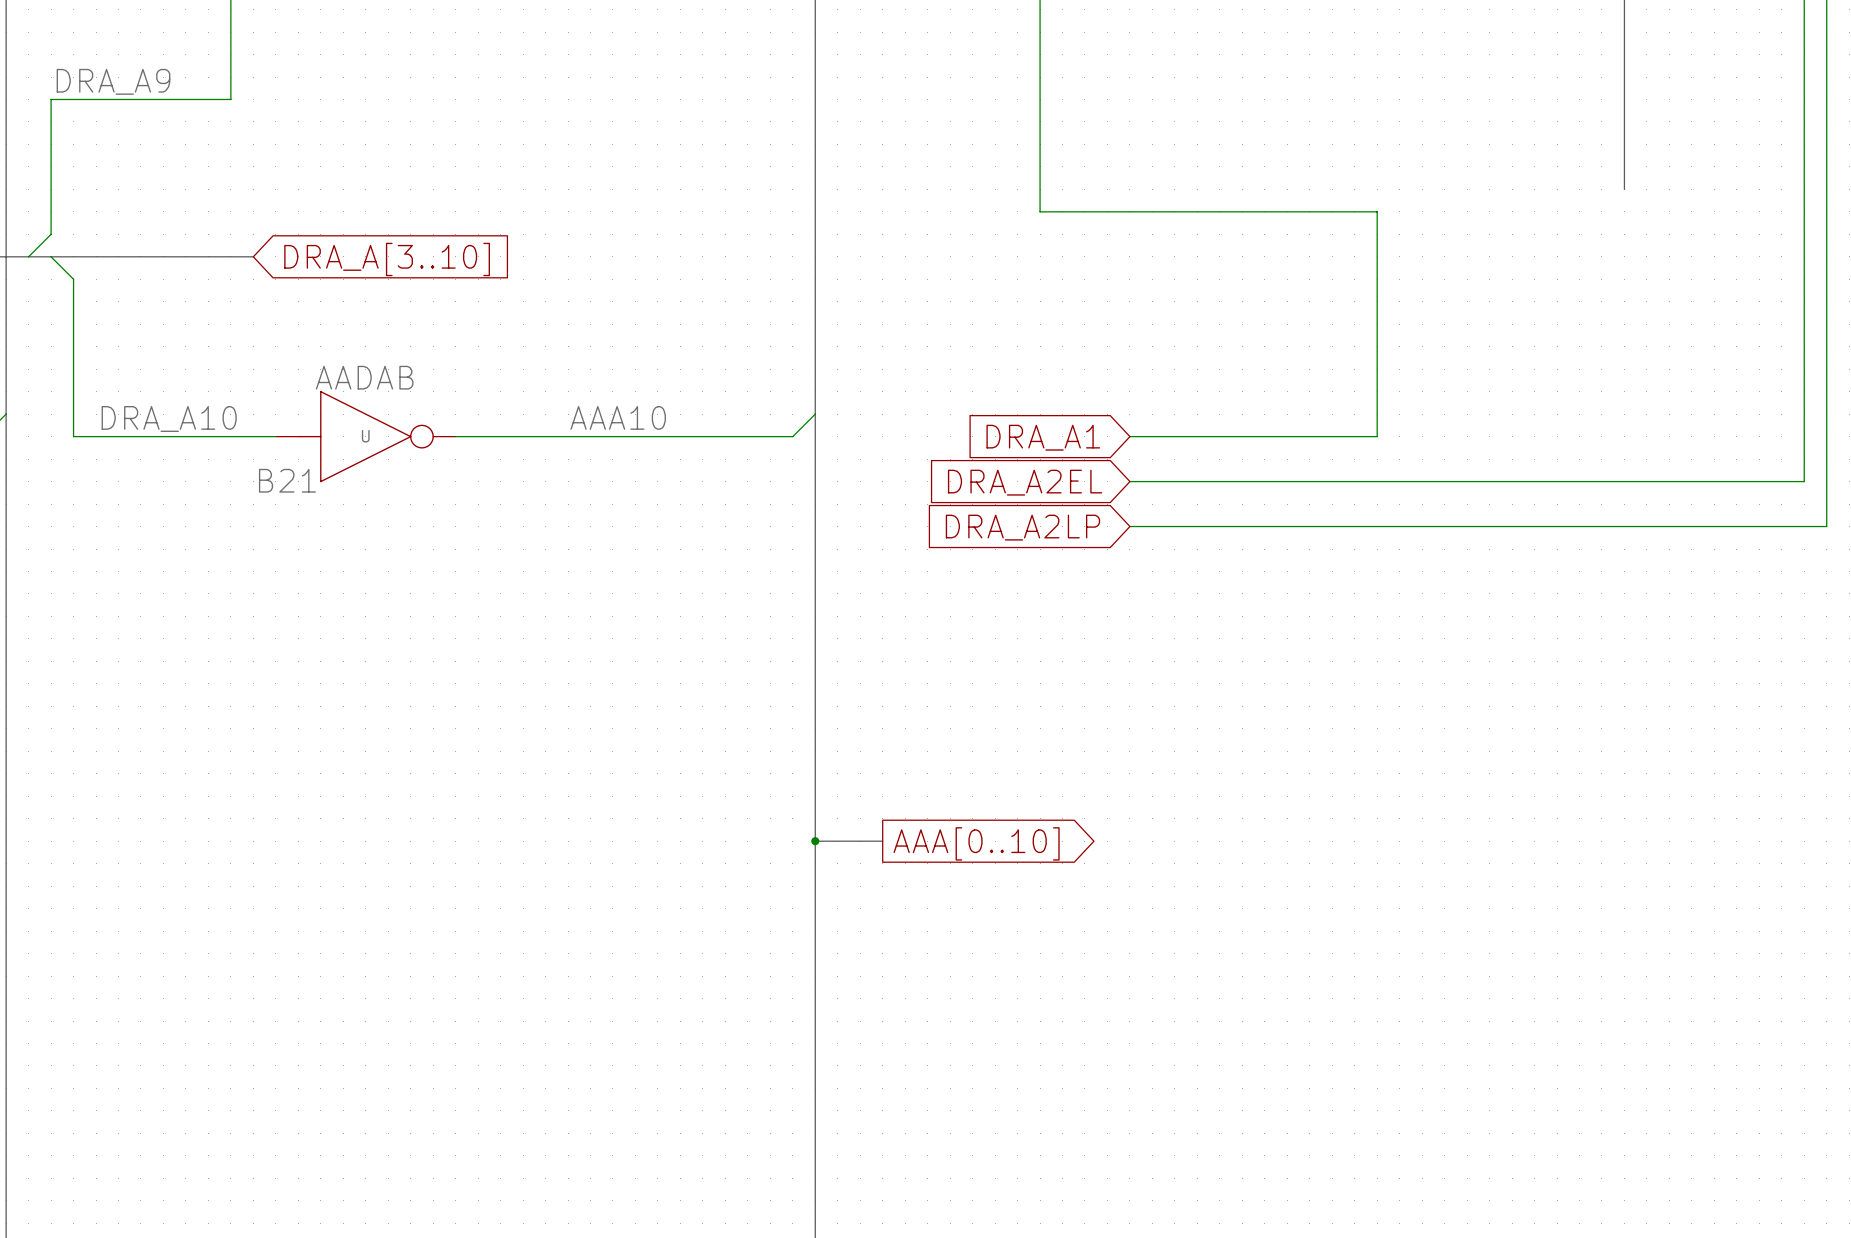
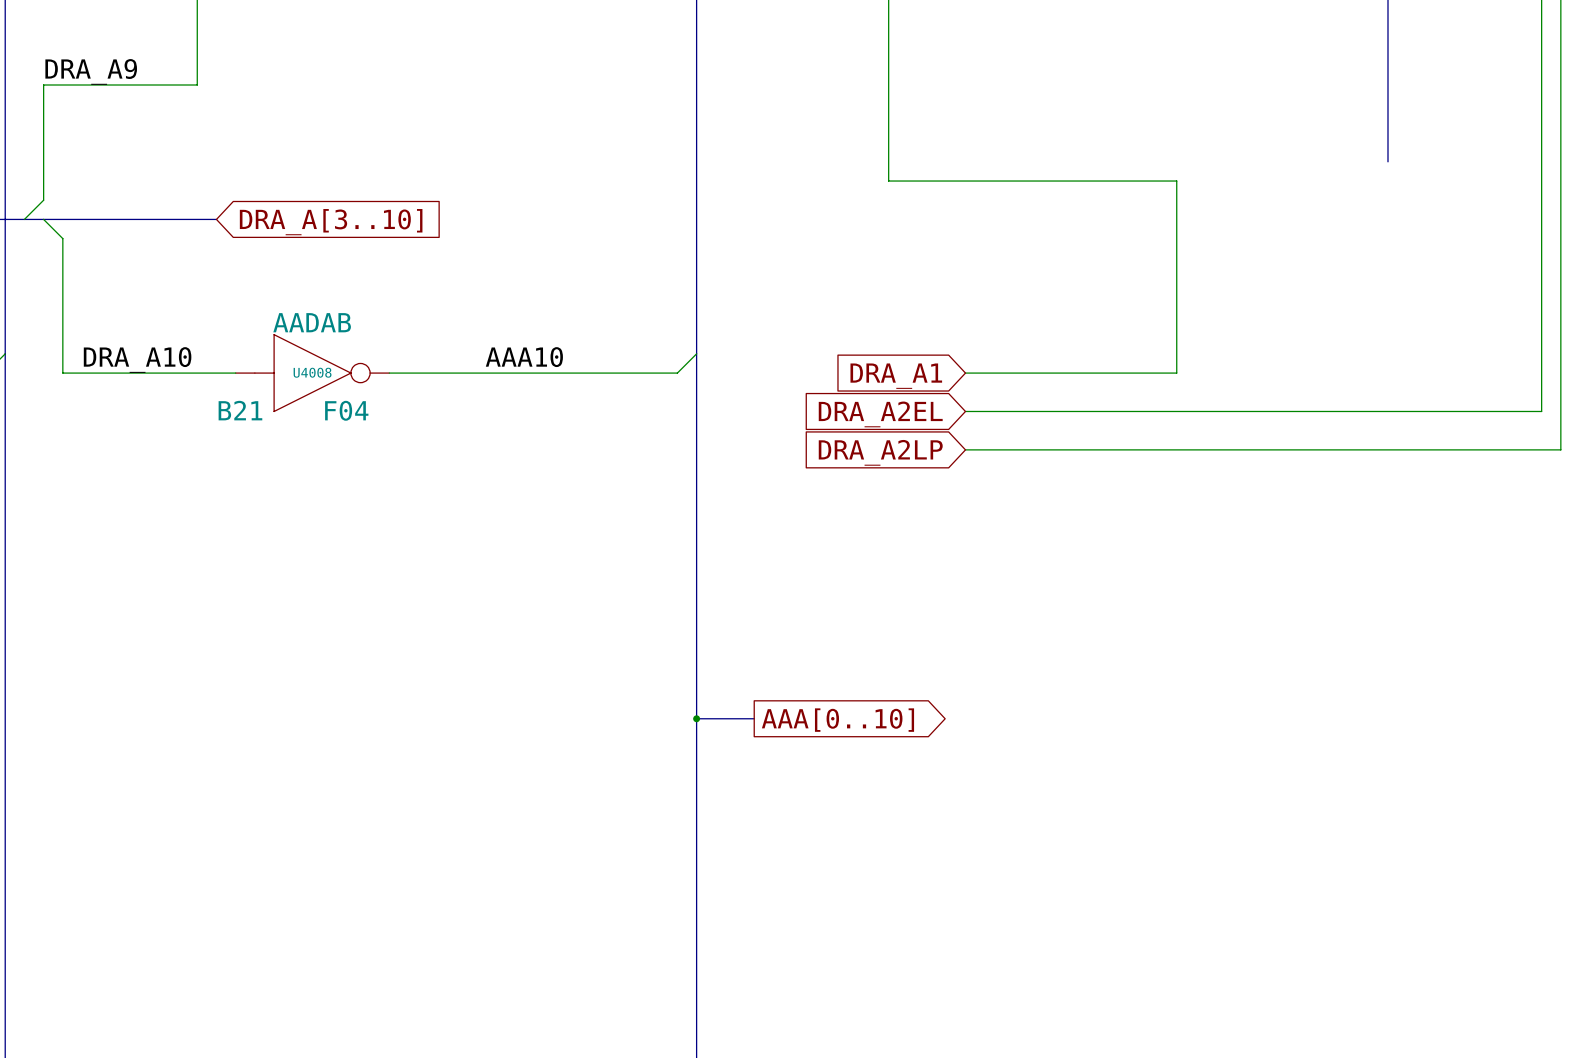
U name: U (365, 436) -> U4008 (312, 372)
U value: none -> F04 (346, 410)

